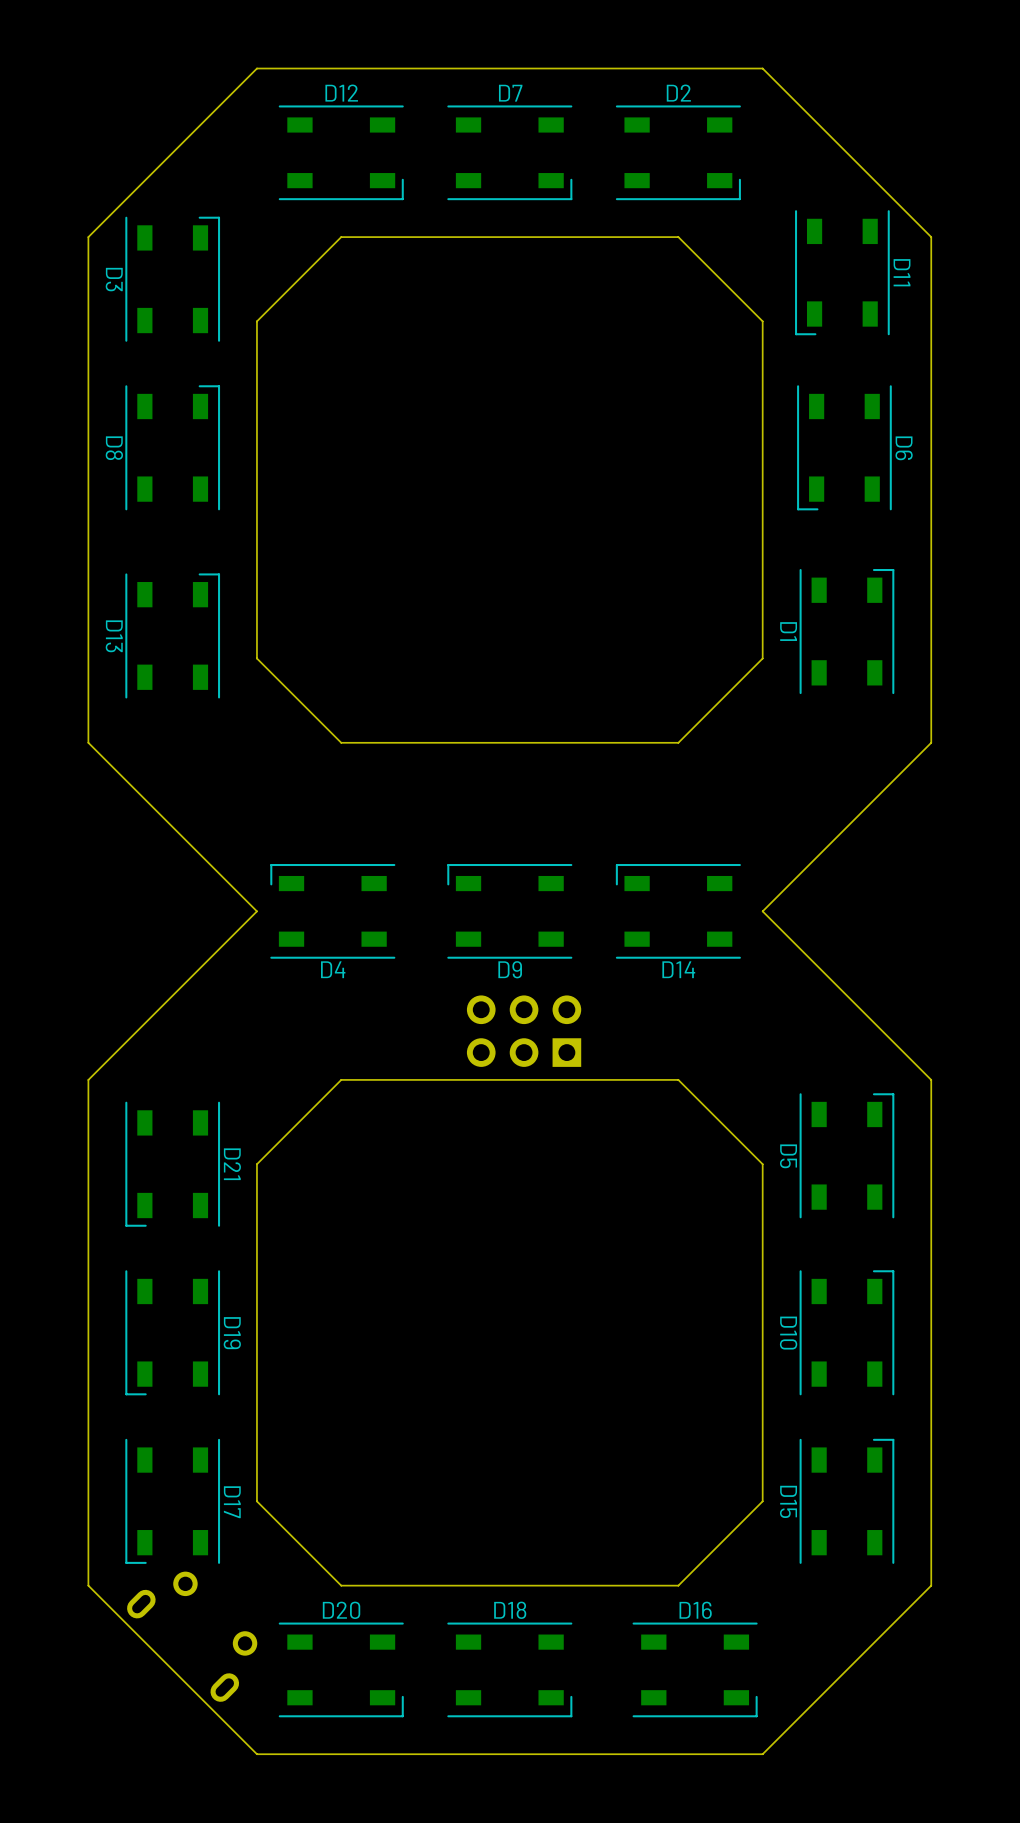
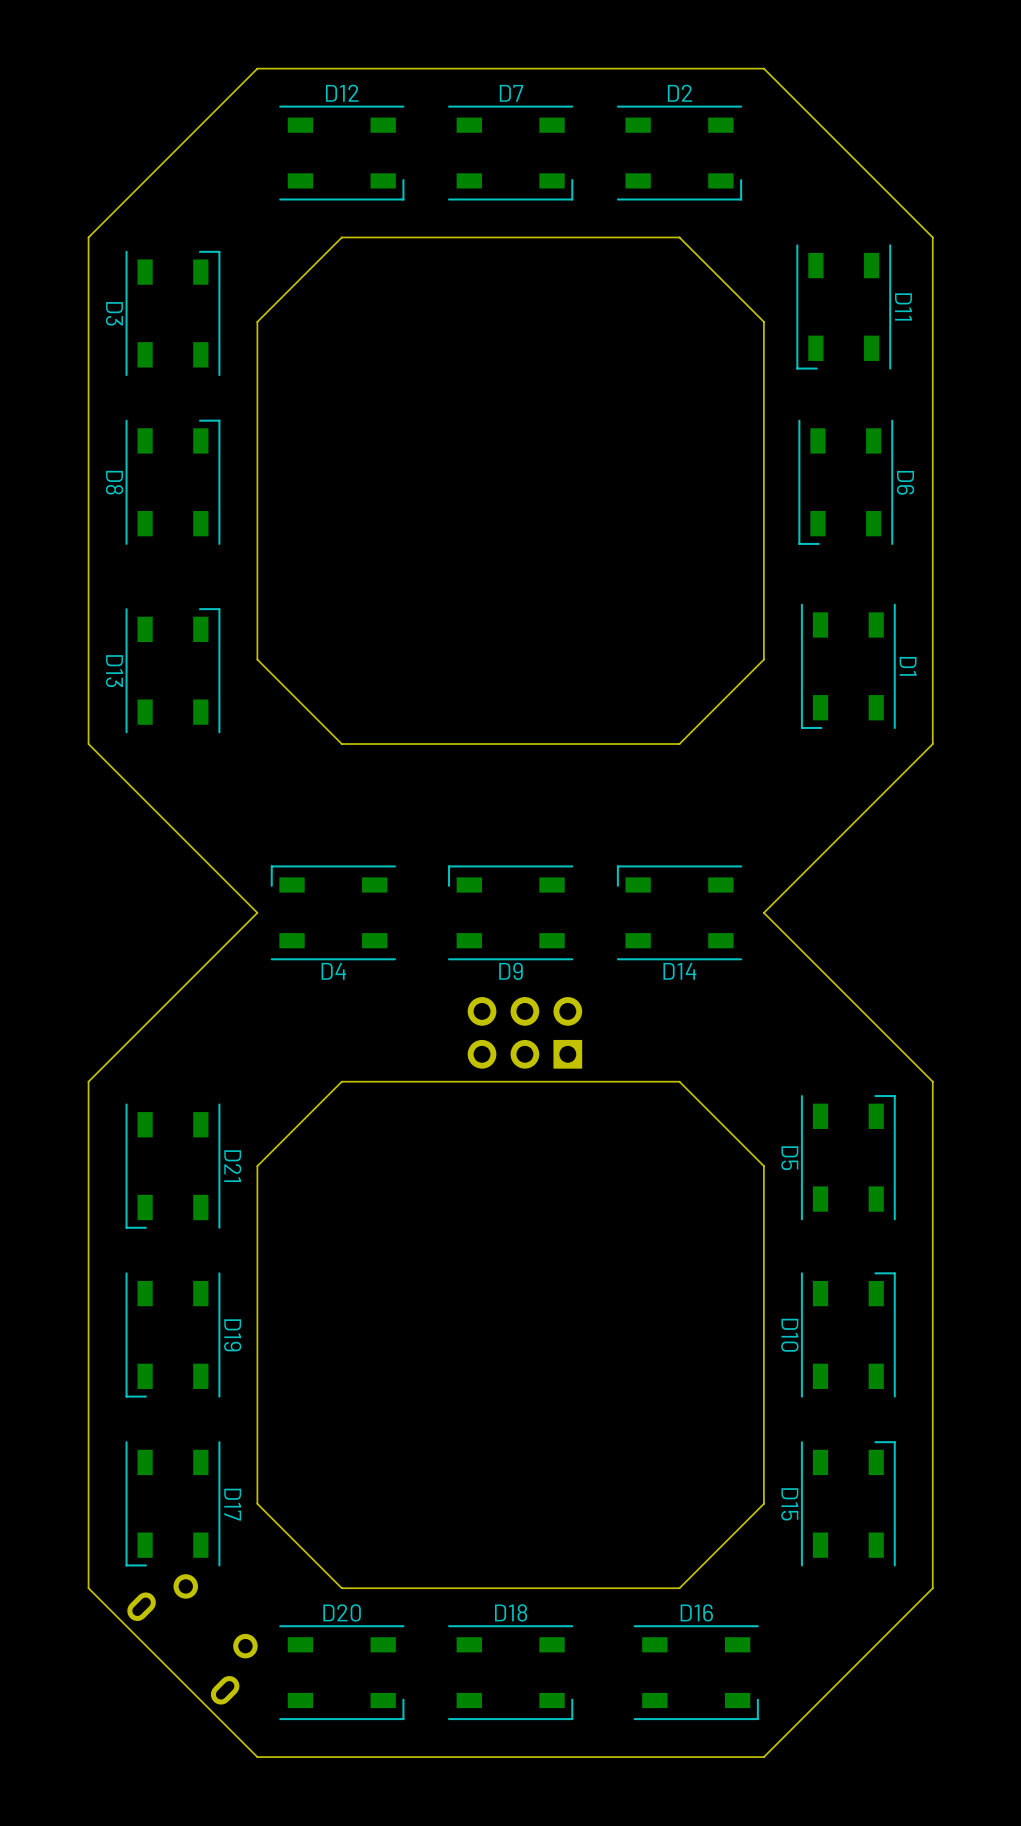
D11 position: (842, 272) -> (843, 306)
D3 position: (172, 279) -> (172, 313)
D8 position: (172, 447) -> (172, 482)
D6 position: (844, 447) -> (845, 482)
D1 rotation: 0° (846, 631) -> 180° (848, 666)
D13 position: (172, 635) -> (172, 670)

